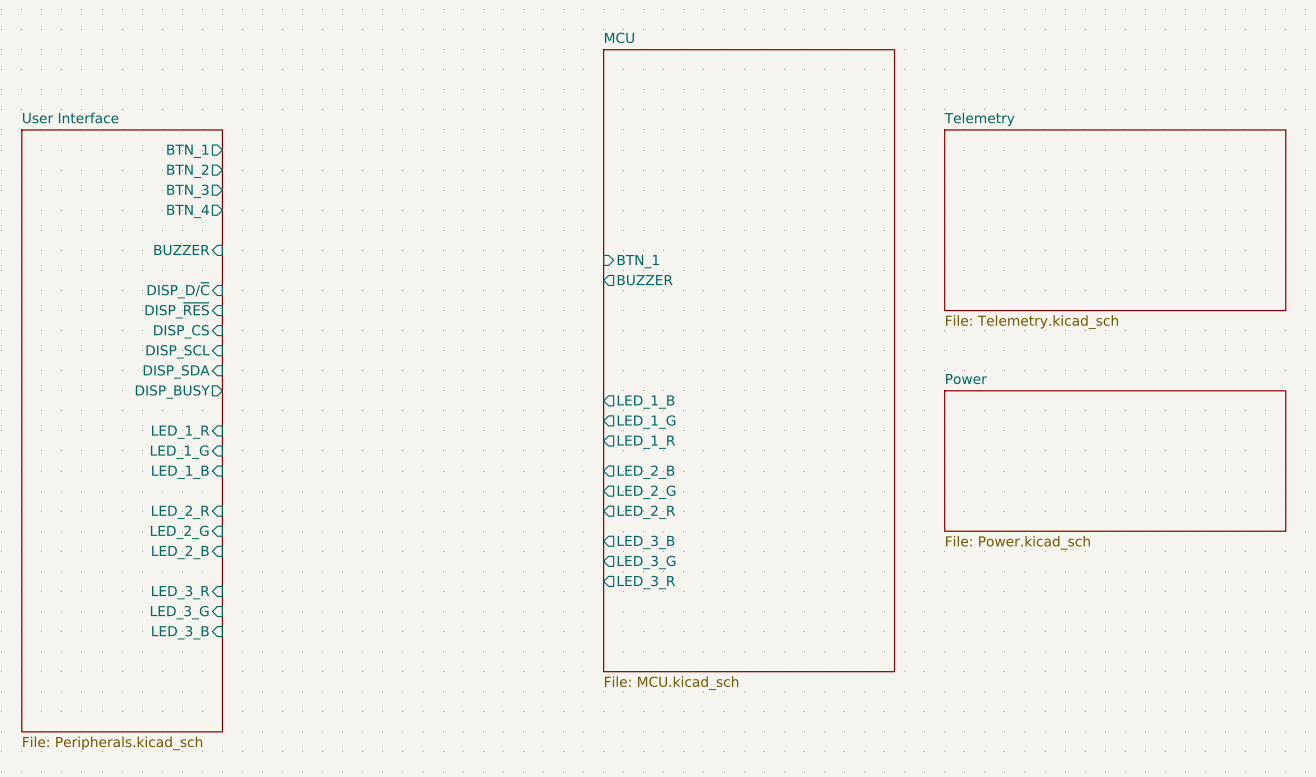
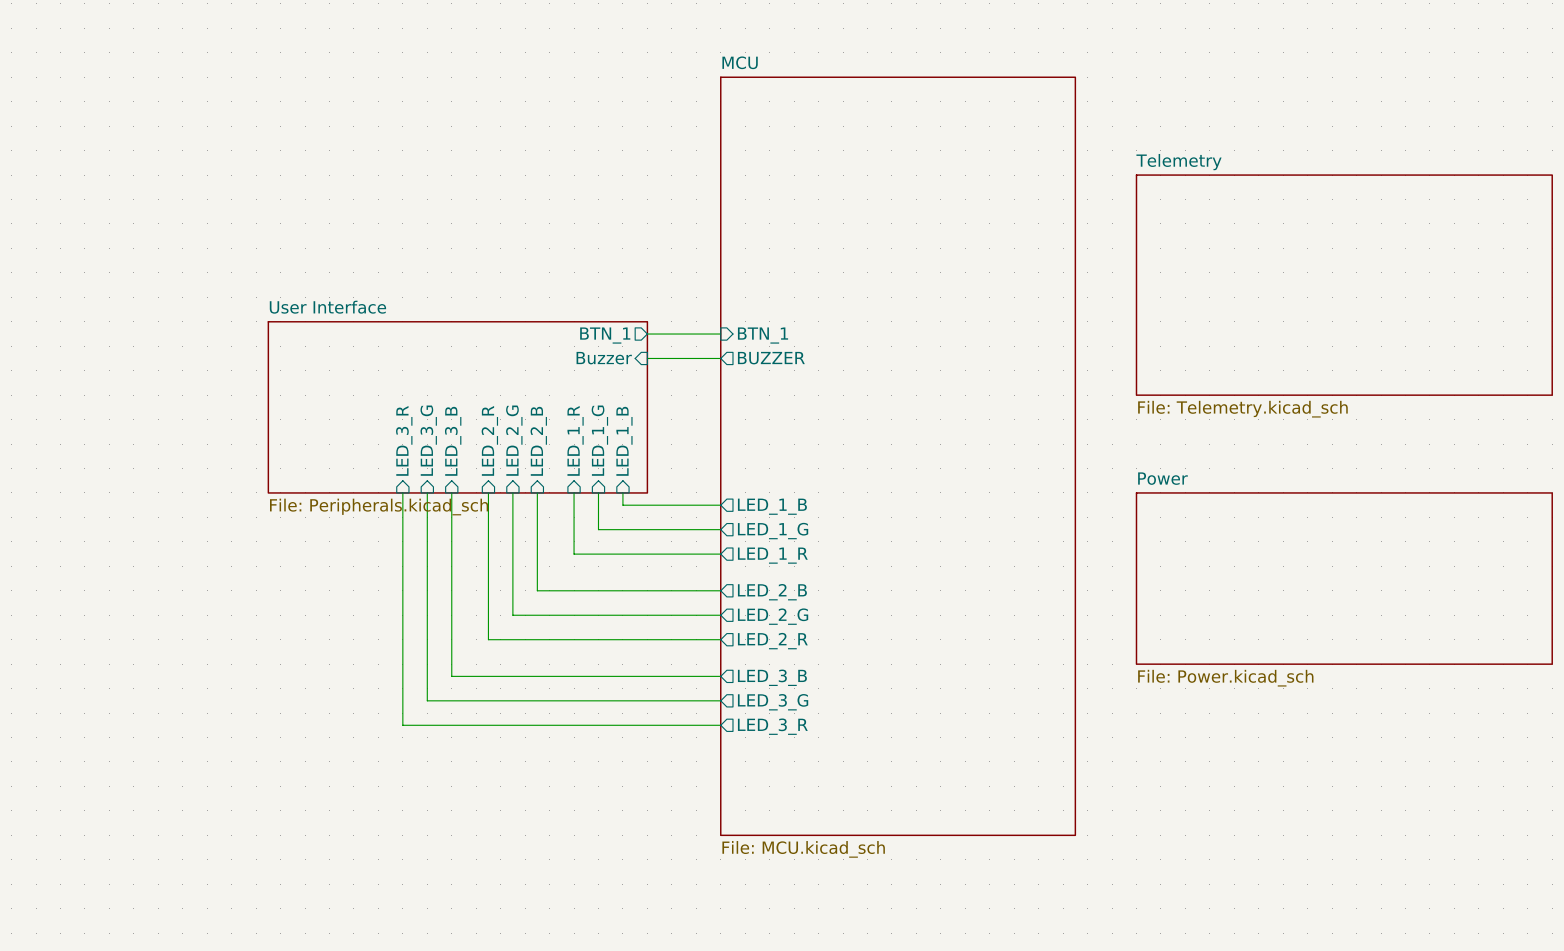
sheet pin: BTN_1 (187, 151) -> none
sheet pin: BTN_2 (187, 171) -> none
sheet pin: BTN_3 (187, 191) -> none
sheet pin: BTN_4 (188, 211) -> none
sheet pin: BUZZER (181, 250) -> none
wire: none -> (647, 334) (720, 334)
sheet pin: none -> BTN_1 (605, 335)
sheet pin: none -> Buzzer (604, 358)
wire: none -> (647, 358) (720, 358)
sheet pin: DISP_D/~{C} (178, 290) -> none
sheet pin: DISP_~{RES} (177, 310) -> none
sheet User Interface: none -> File: Peripherals.kicad_sch (457, 407)
sheet pin: DISP_CS (181, 331) -> none
sheet pin: none -> LED_3_G (428, 440)
sheet pin: none -> LED_2_G (514, 440)
sheet pin: none -> LED_1_G (599, 440)
sheet pin: none -> LED_3_R (404, 440)
sheet pin: none -> LED_3_B (453, 441)
sheet pin: none -> LED_2_R (489, 440)
sheet pin: none -> LED_2_B (538, 441)
sheet pin: none -> LED_1_R (575, 440)
sheet pin: none -> LED_1_B (624, 441)
sheet pin: DISP_SCL (178, 351) -> none
sheet pin: DISP_SDA (176, 371) -> none
wire: none -> (402, 492) (402, 725) (720, 725)
wire: none -> (427, 492) (427, 700) (720, 700)
wire: none -> (451, 492) (451, 676) (720, 676)
wire: none -> (488, 492) (488, 639) (720, 639)
wire: none -> (512, 492) (512, 615) (720, 615)
wire: none -> (537, 492) (537, 590) (720, 590)
wire: none -> (574, 492) (574, 554) (720, 554)
wire: none -> (598, 492) (598, 529) (720, 529)
wire: none -> (622, 492) (622, 505) (720, 505)
sheet pin: DISP_BUSY (172, 391) -> none
sheet User Interface: File: Peripherals.kicad_sch (122, 430) -> none
sheet pin: LED_1_R (180, 432) -> none
sheet pin: LED_1_G (179, 452) -> none
sheet pin: LED_1_B (180, 472) -> none
sheet pin: LED_2_R (180, 512) -> none
sheet pin: LED_2_G (179, 532) -> none
sheet pin: LED_2_B (180, 552) -> none
sheet pin: LED_3_R (180, 592) -> none
sheet pin: LED_3_G (179, 612) -> none
sheet pin: LED_3_B (180, 632) -> none

